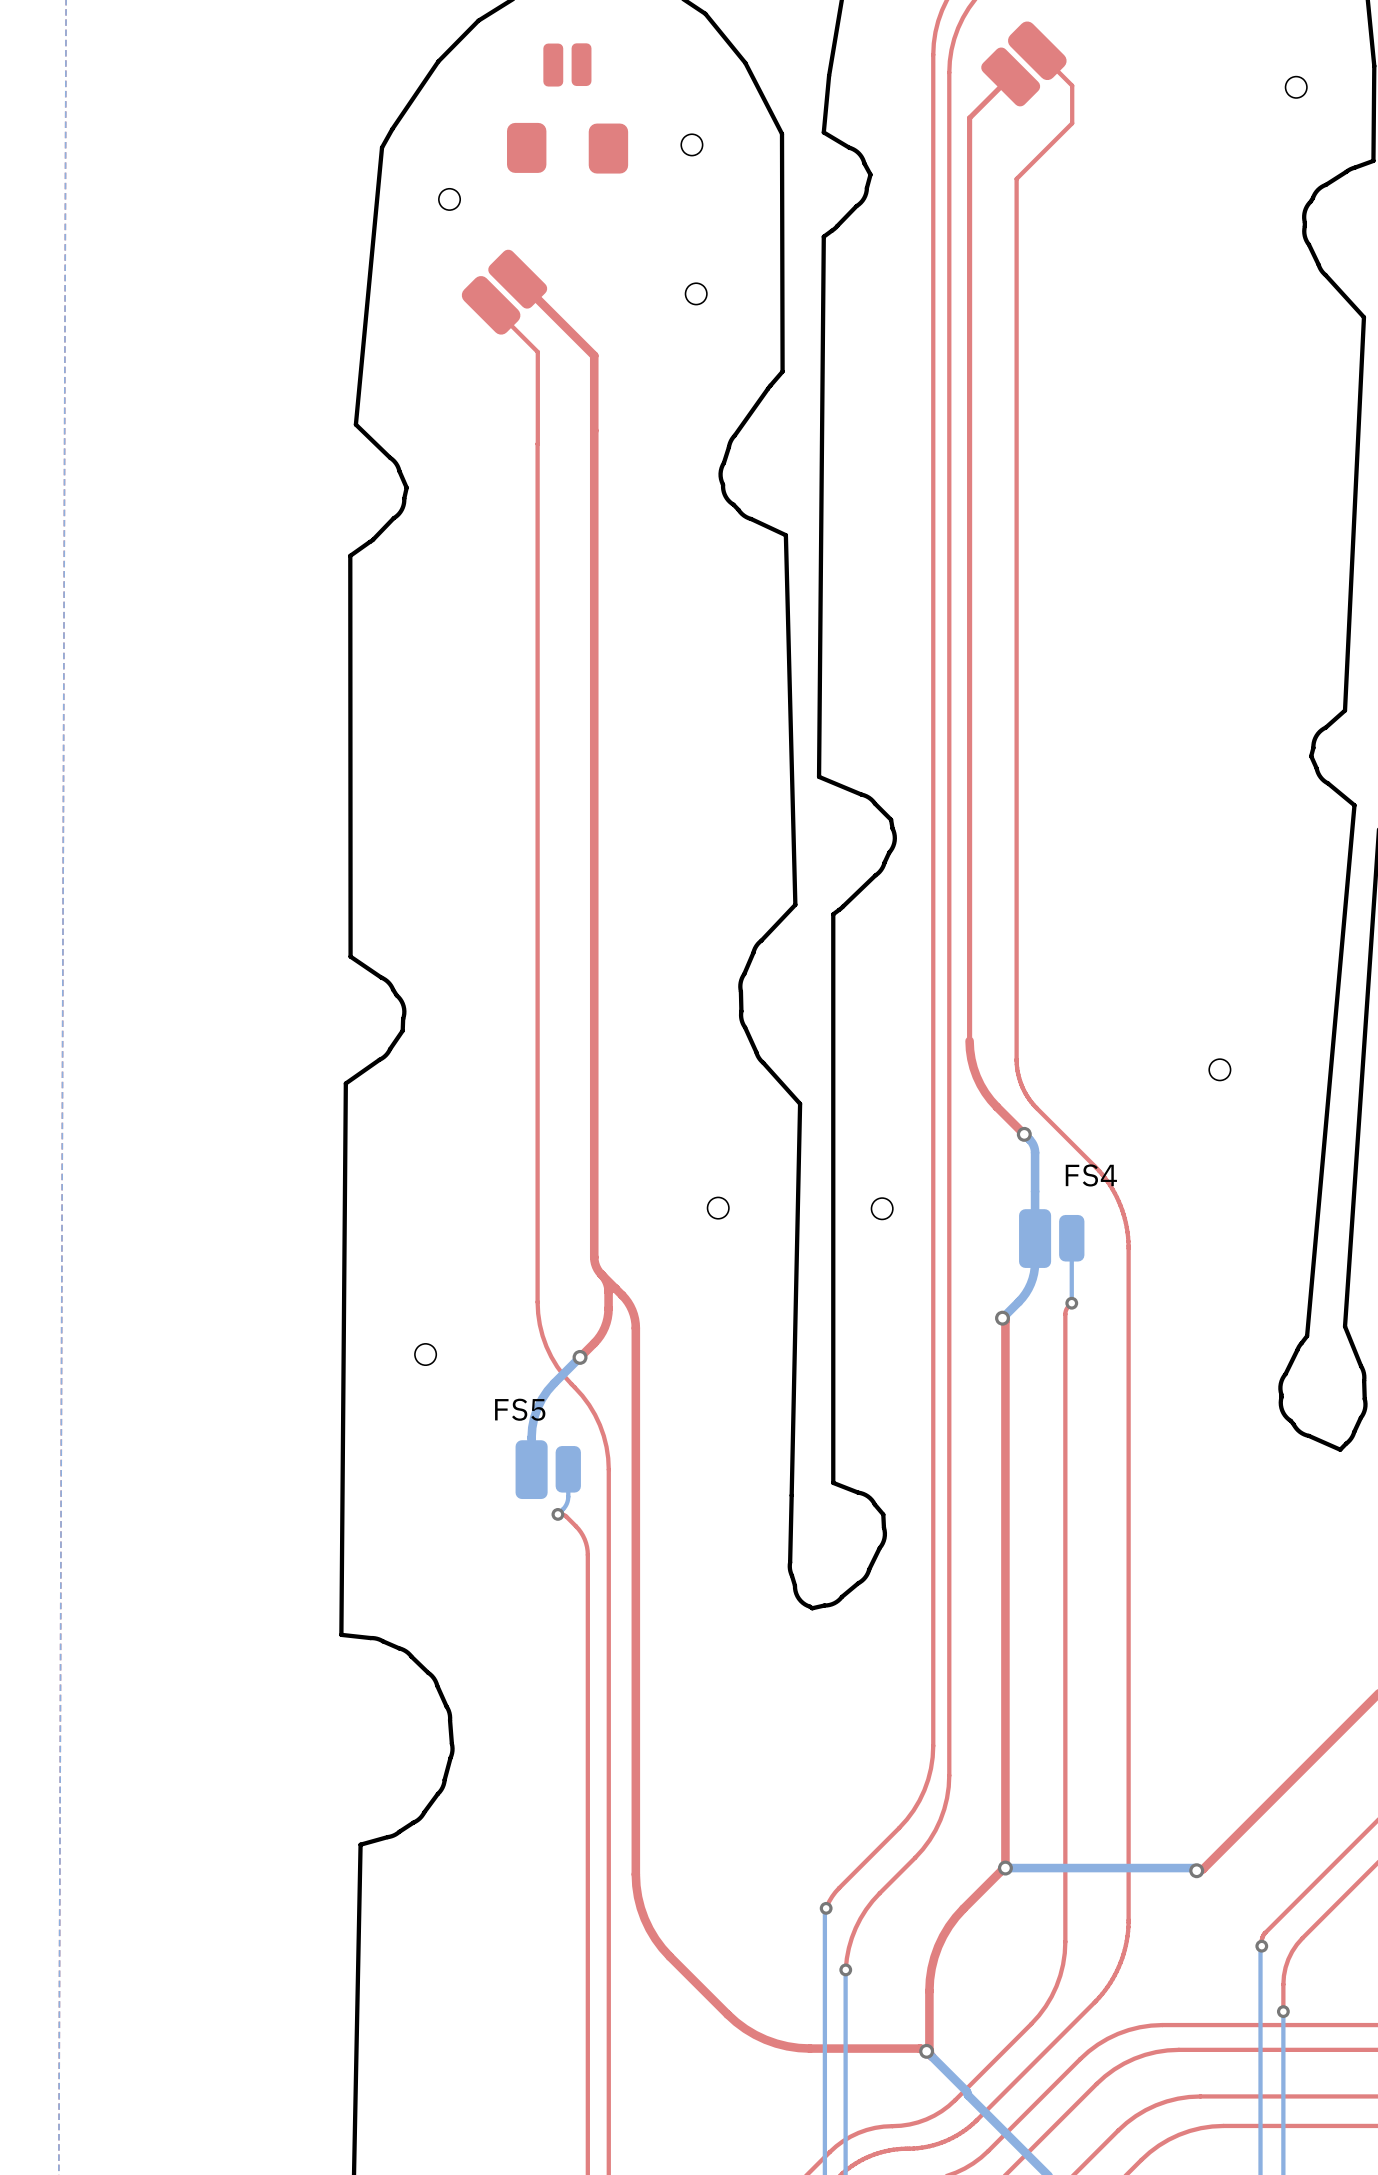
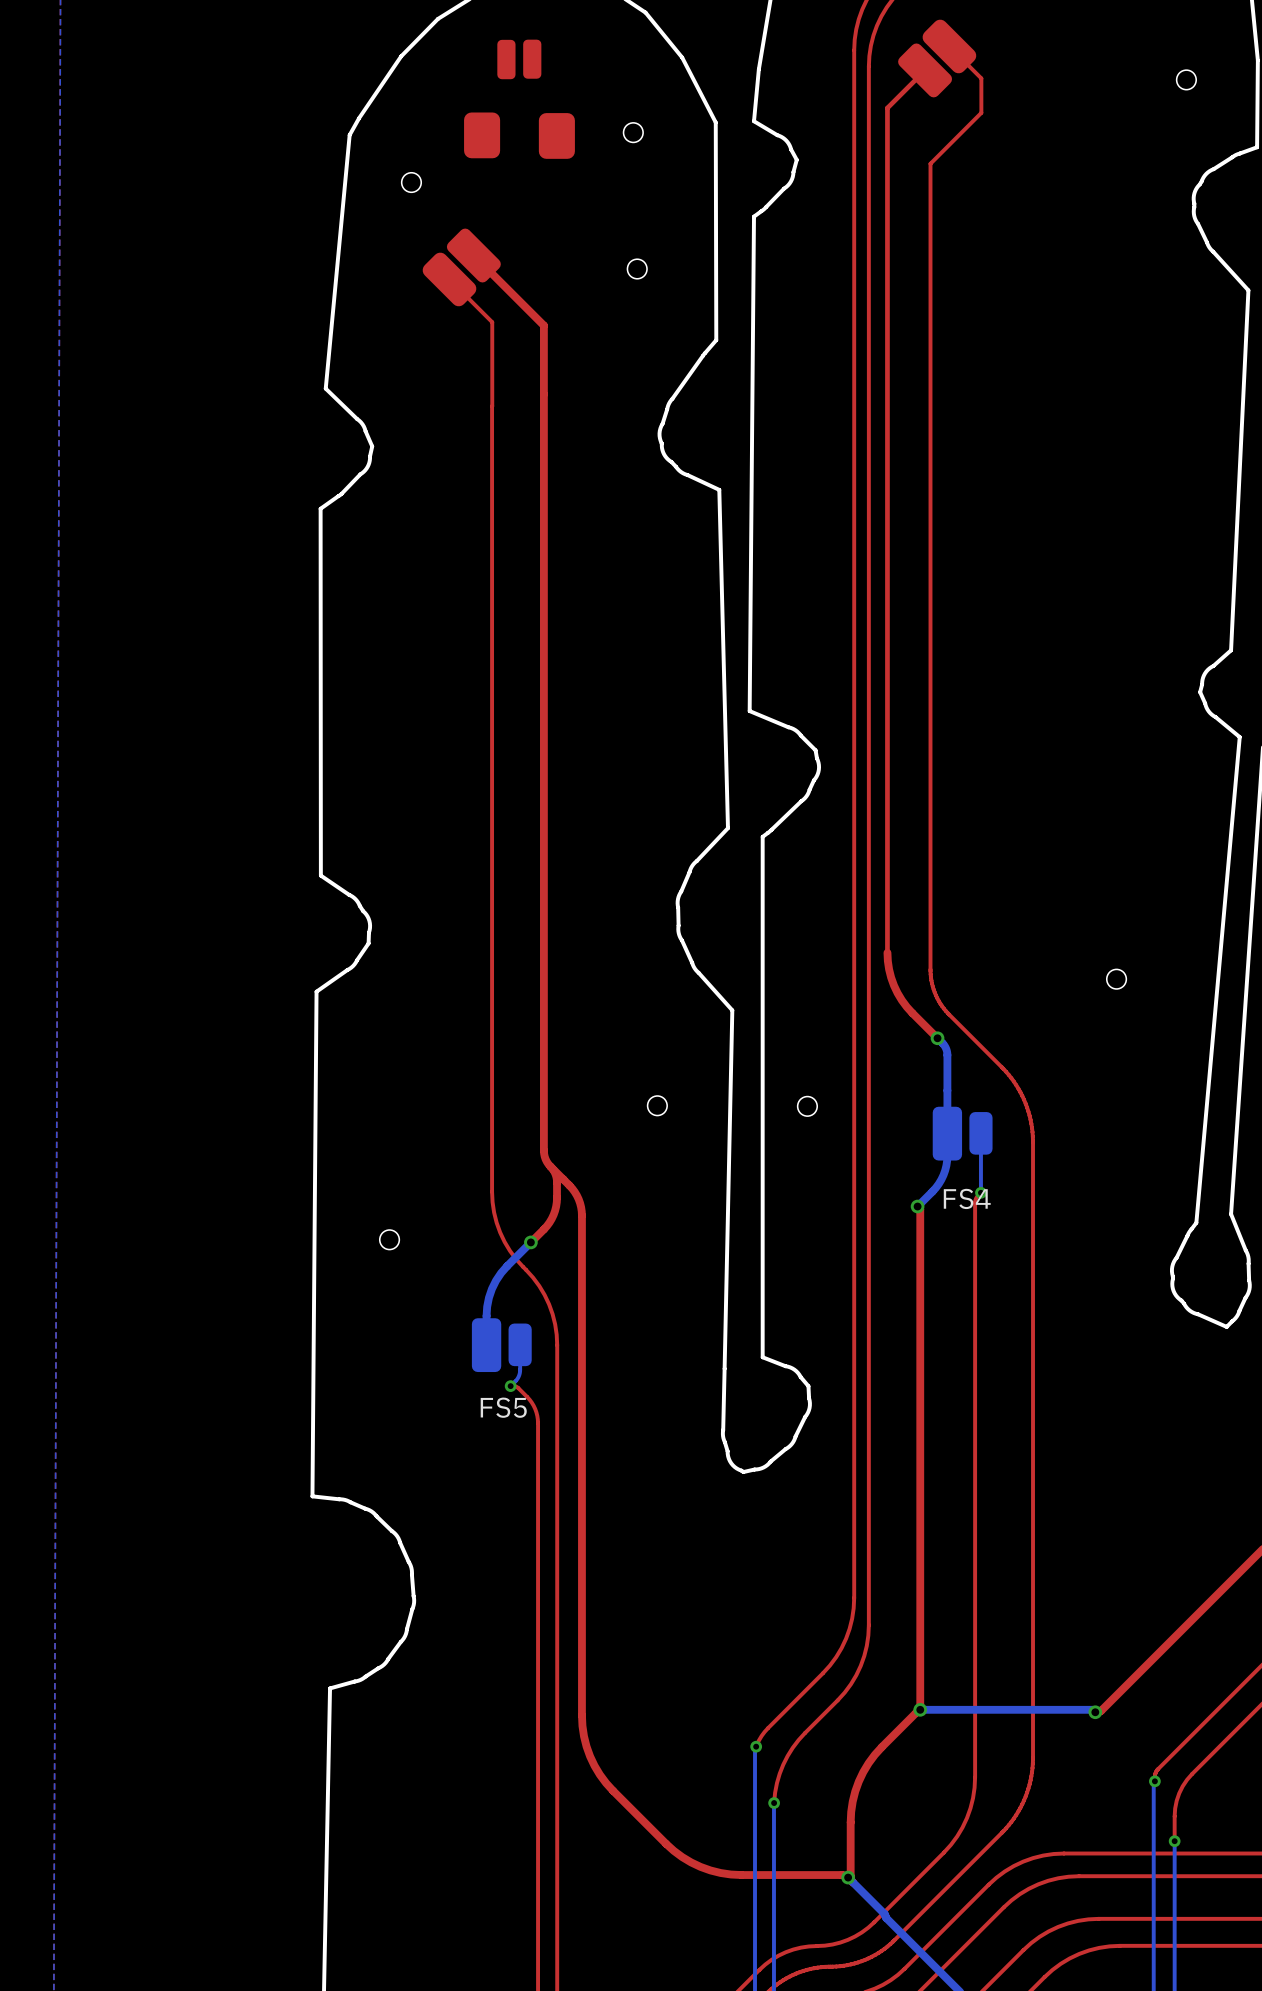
FS4 name position: FS4 (1091, 1175) -> FS4 (967, 1198)
FS5 name position: FS5 (520, 1409) -> FS5 (503, 1407)

